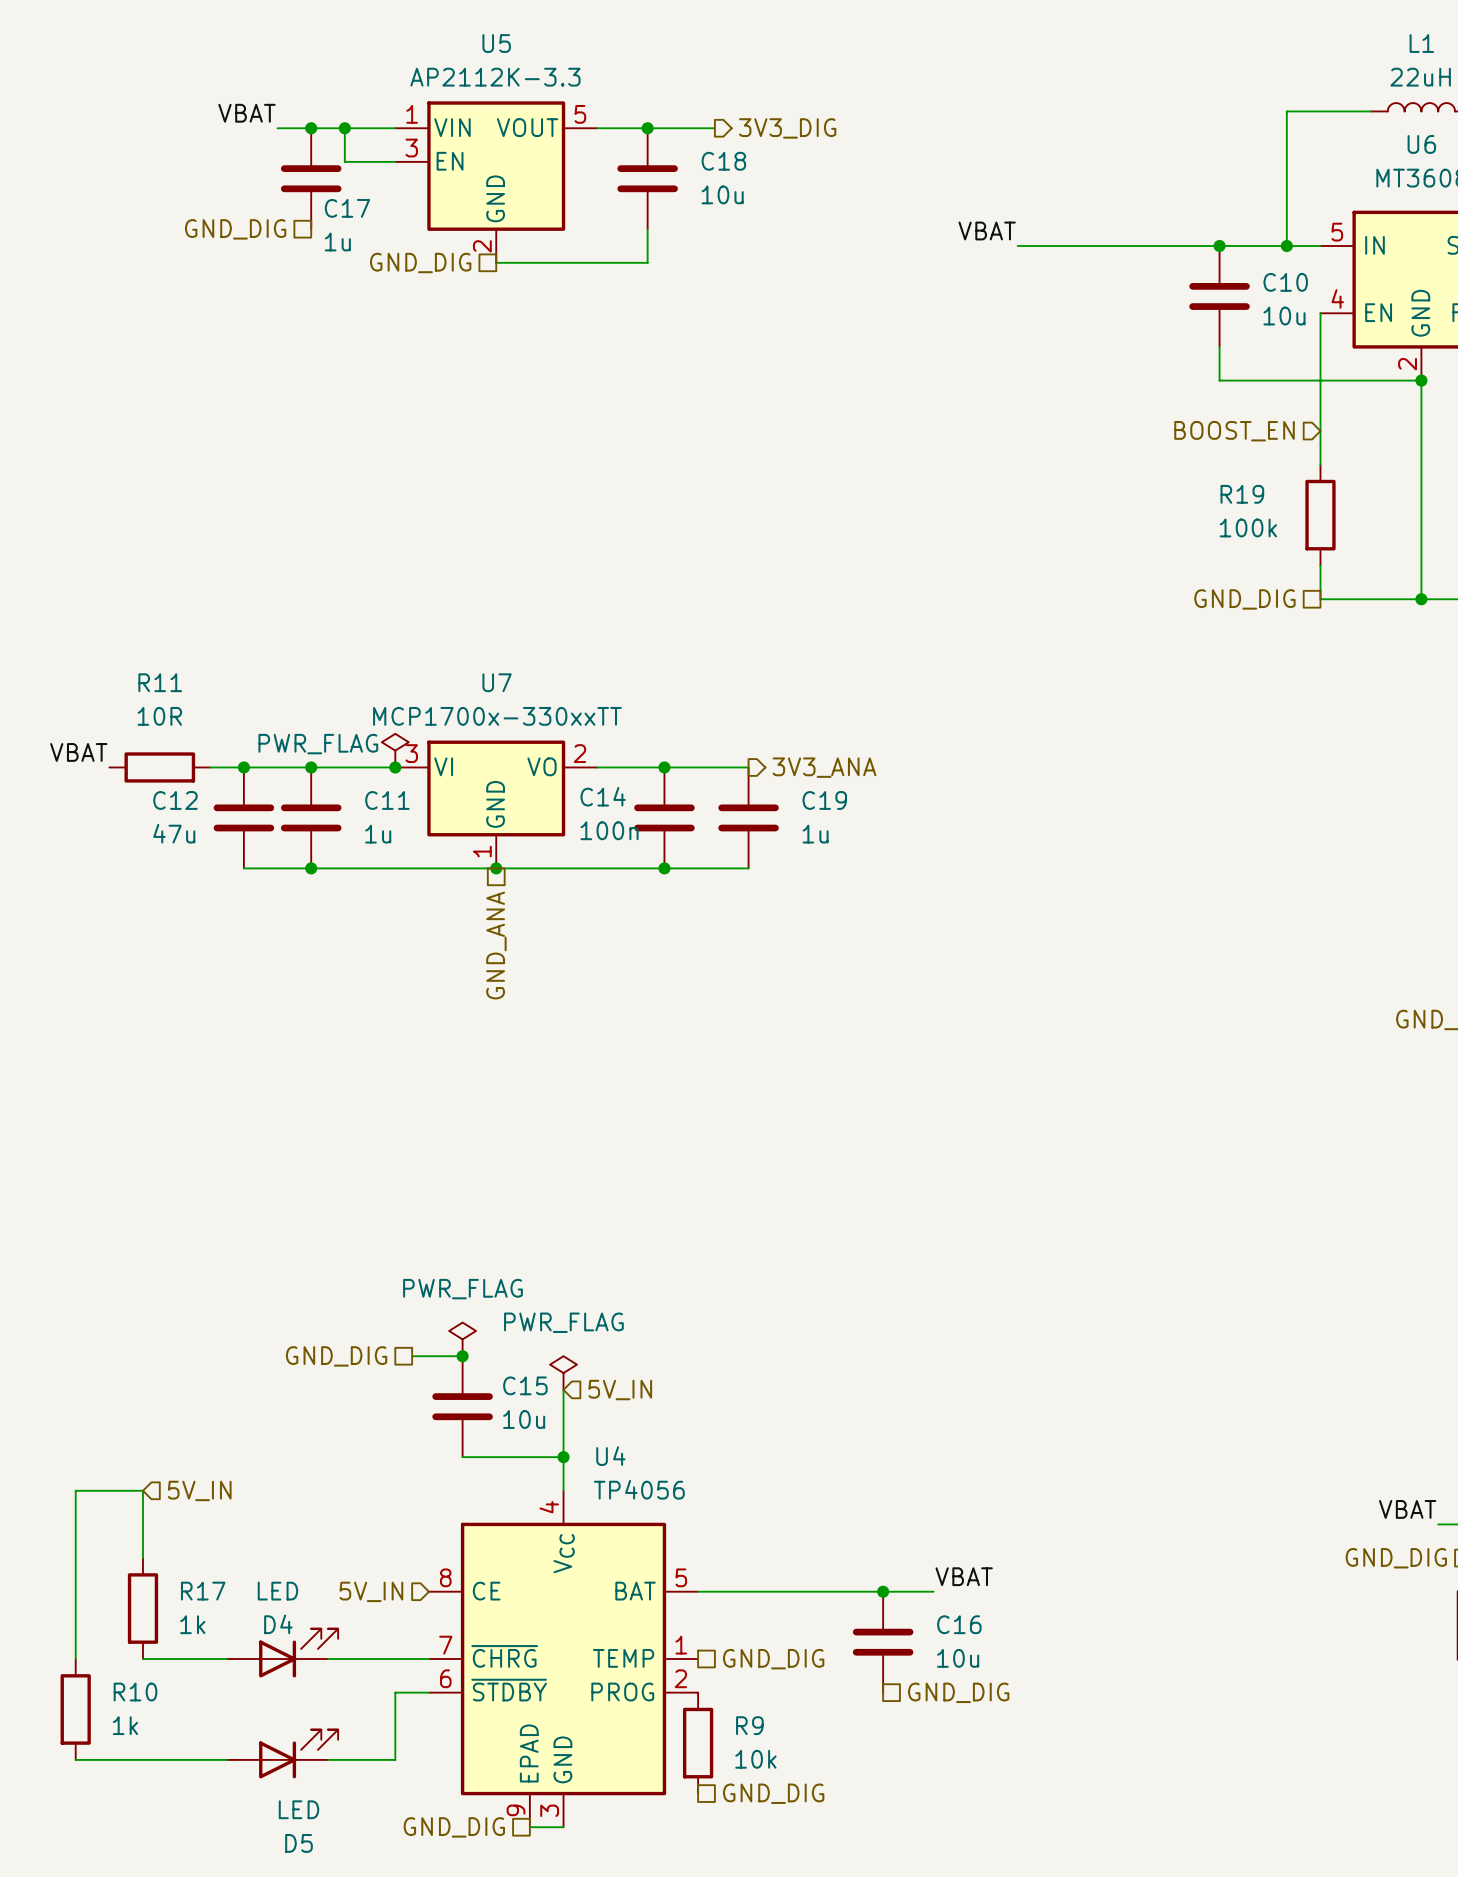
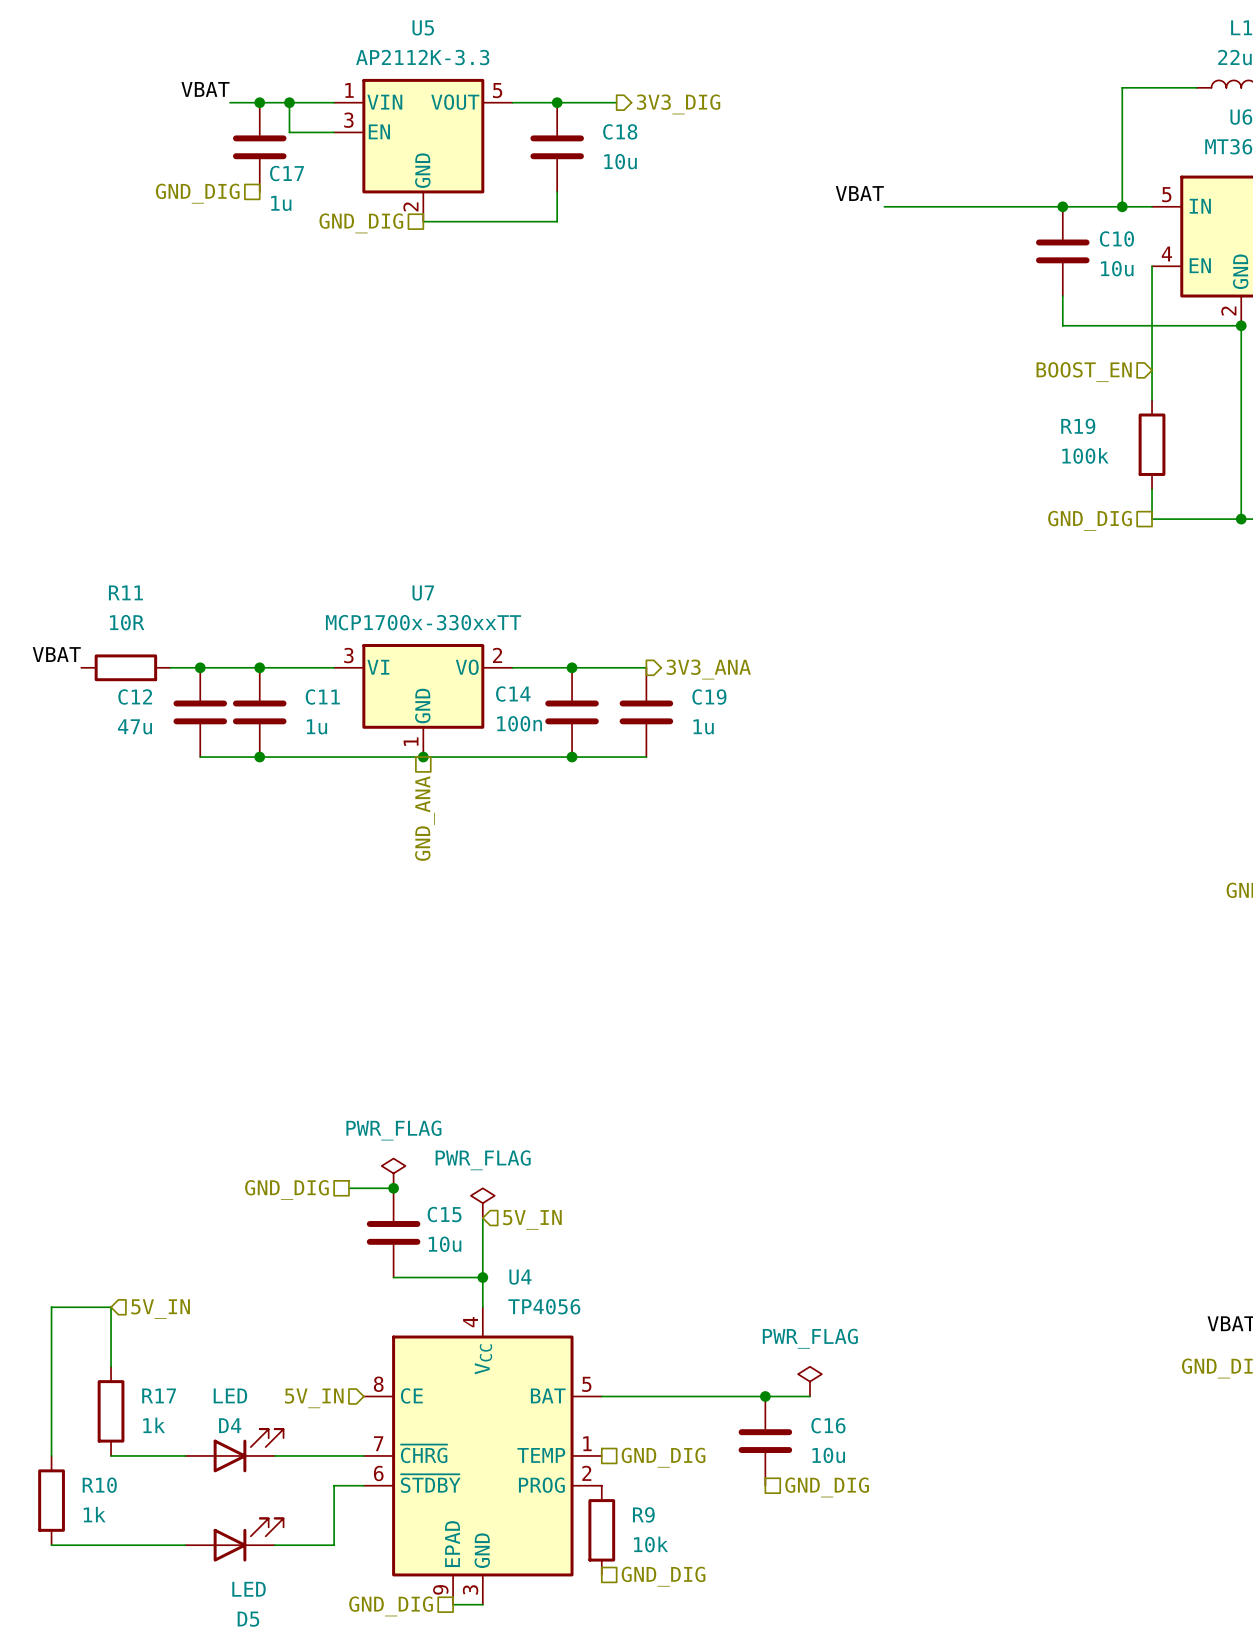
power symbol: PWR_FLAG (395, 750) -> none
junction: (395, 767) -> none
power symbol: none -> PWR_FLAG (809, 1381)
label: VBAT (964, 1576) -> none

